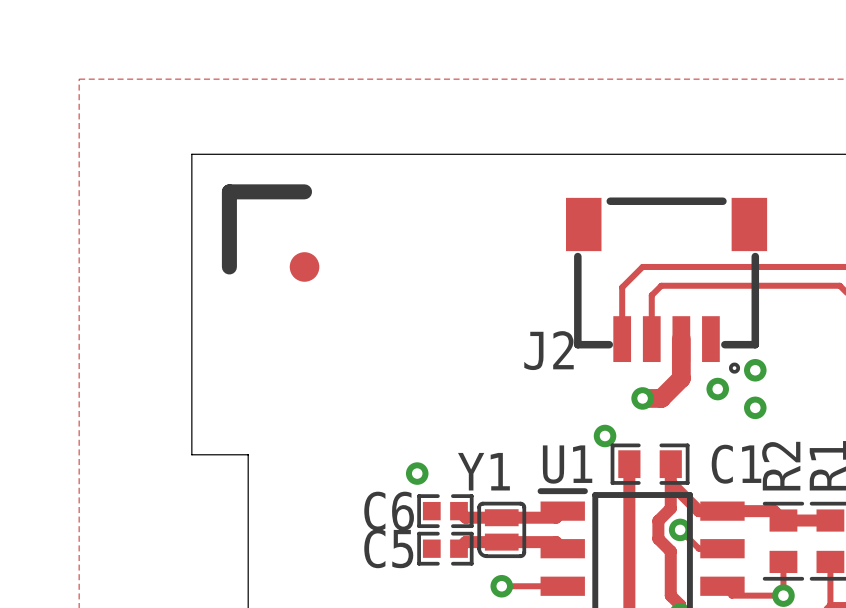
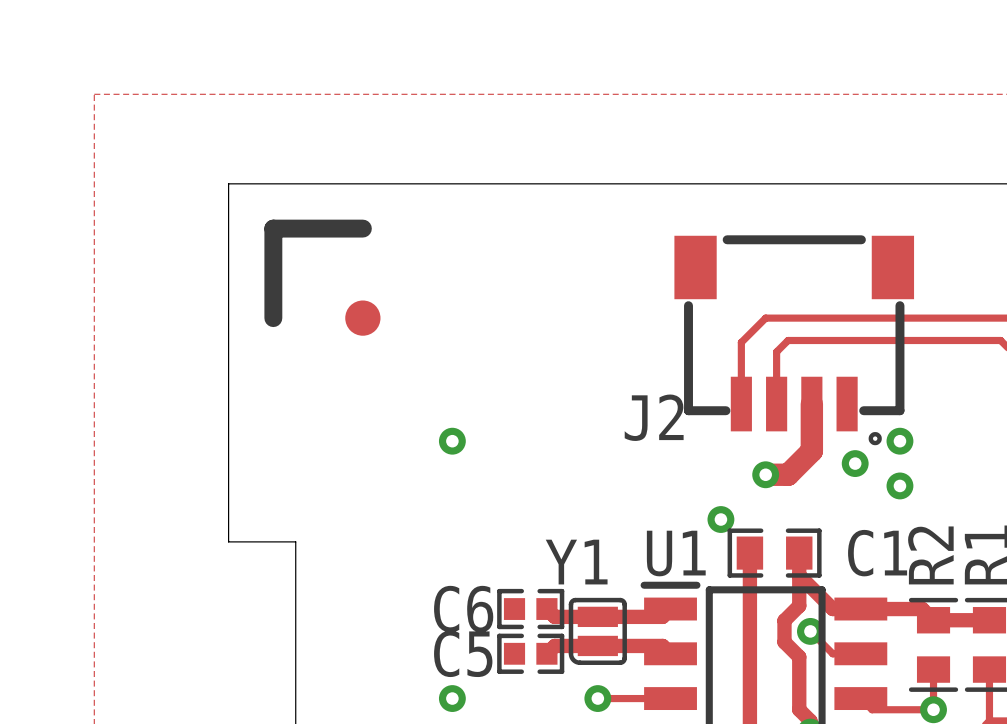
via: none -> (452, 441)
via: (417, 473) -> none
via: none -> (452, 698)

